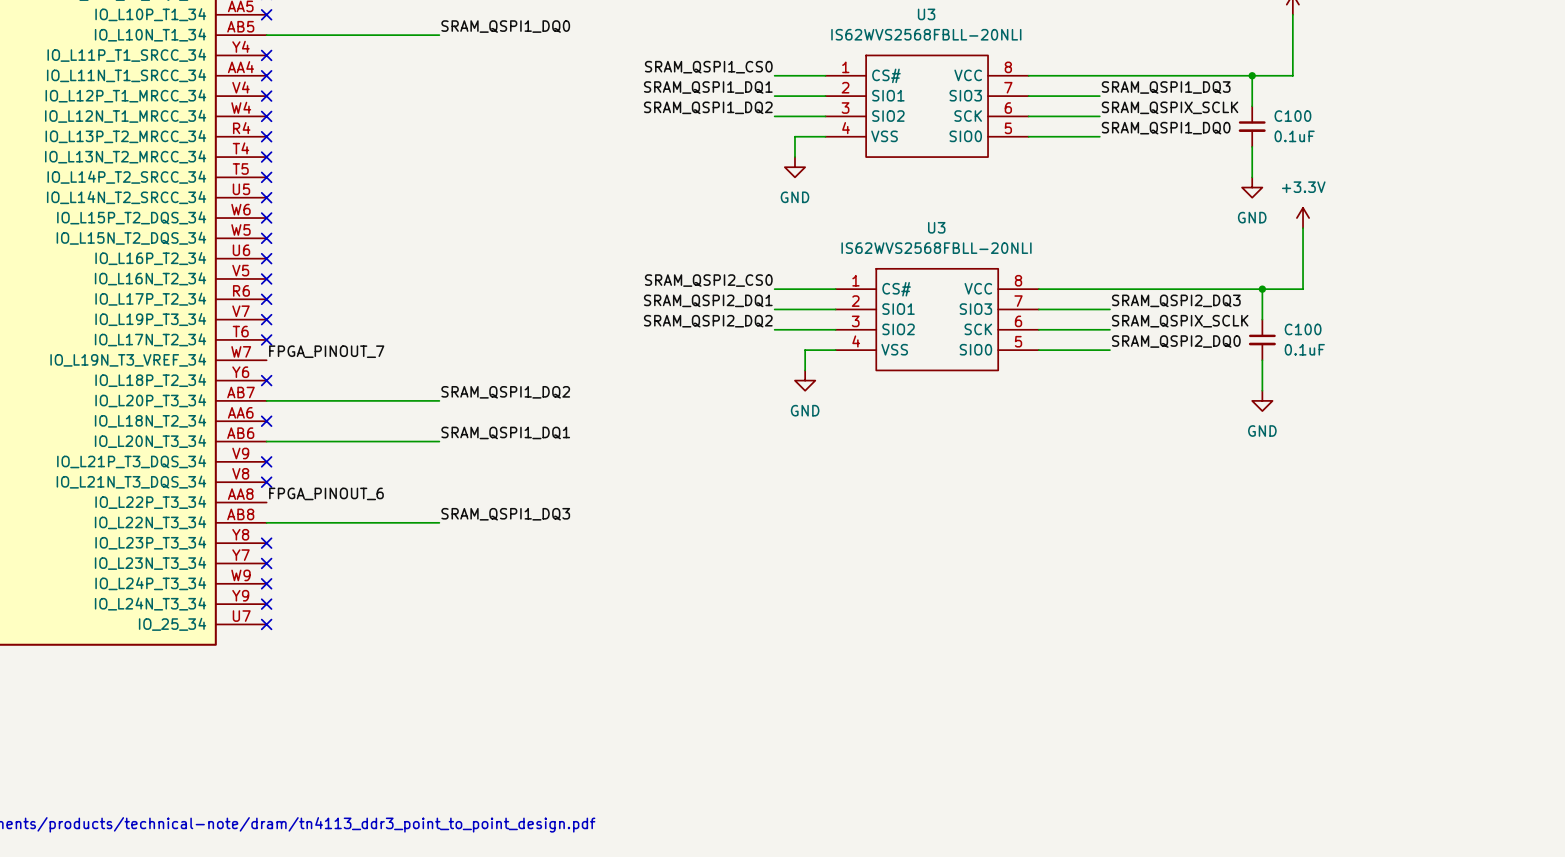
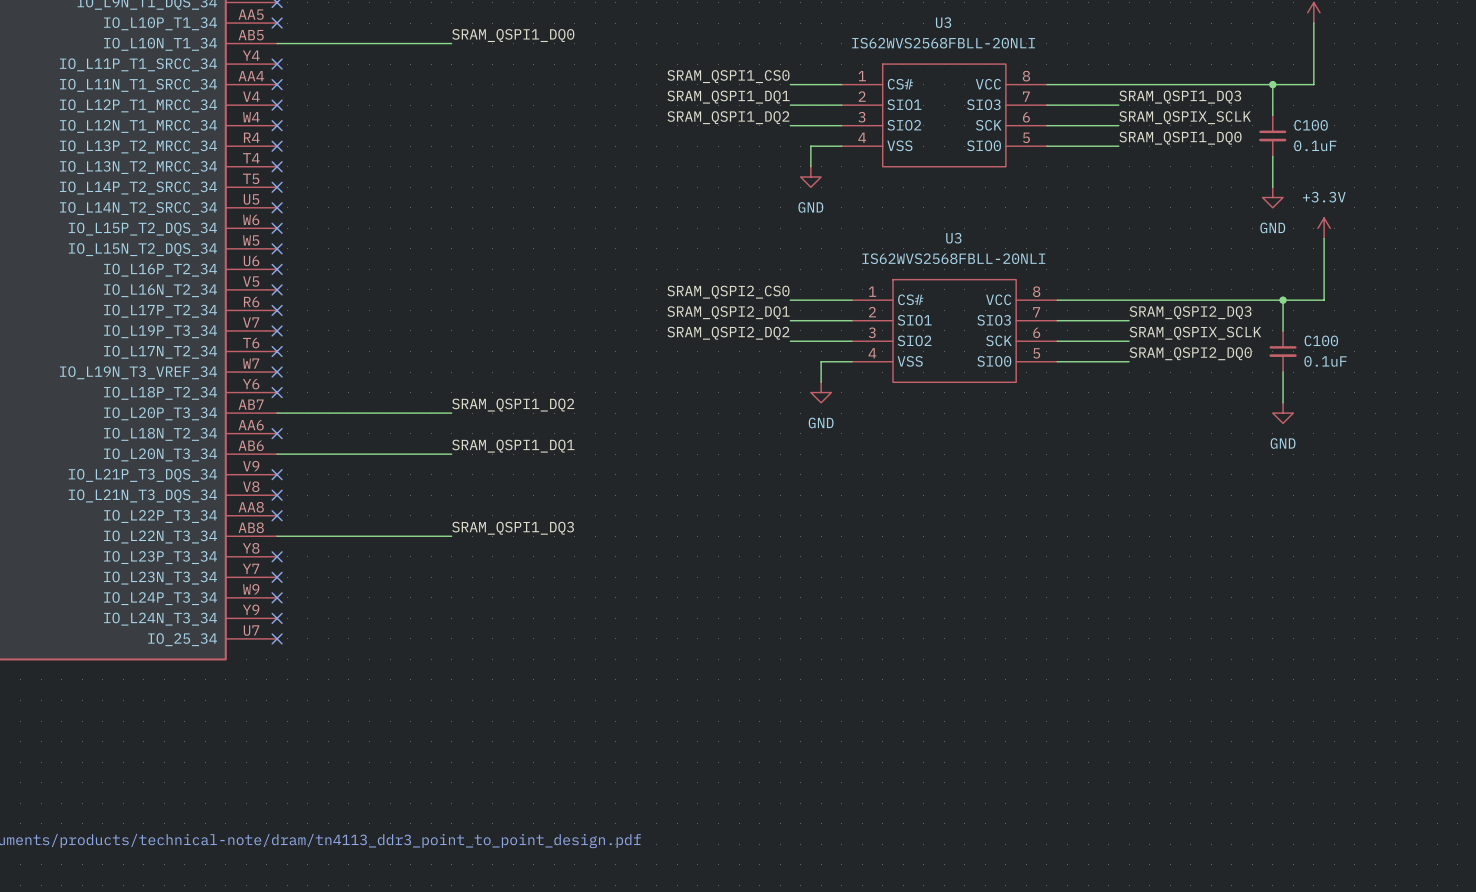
label: FPGA_PINOUT_7 (326, 351) -> none
no-connect mark: none -> (277, 372)
label: FPGA_PINOUT_6 (326, 493) -> none
no-connect mark: none -> (277, 515)

